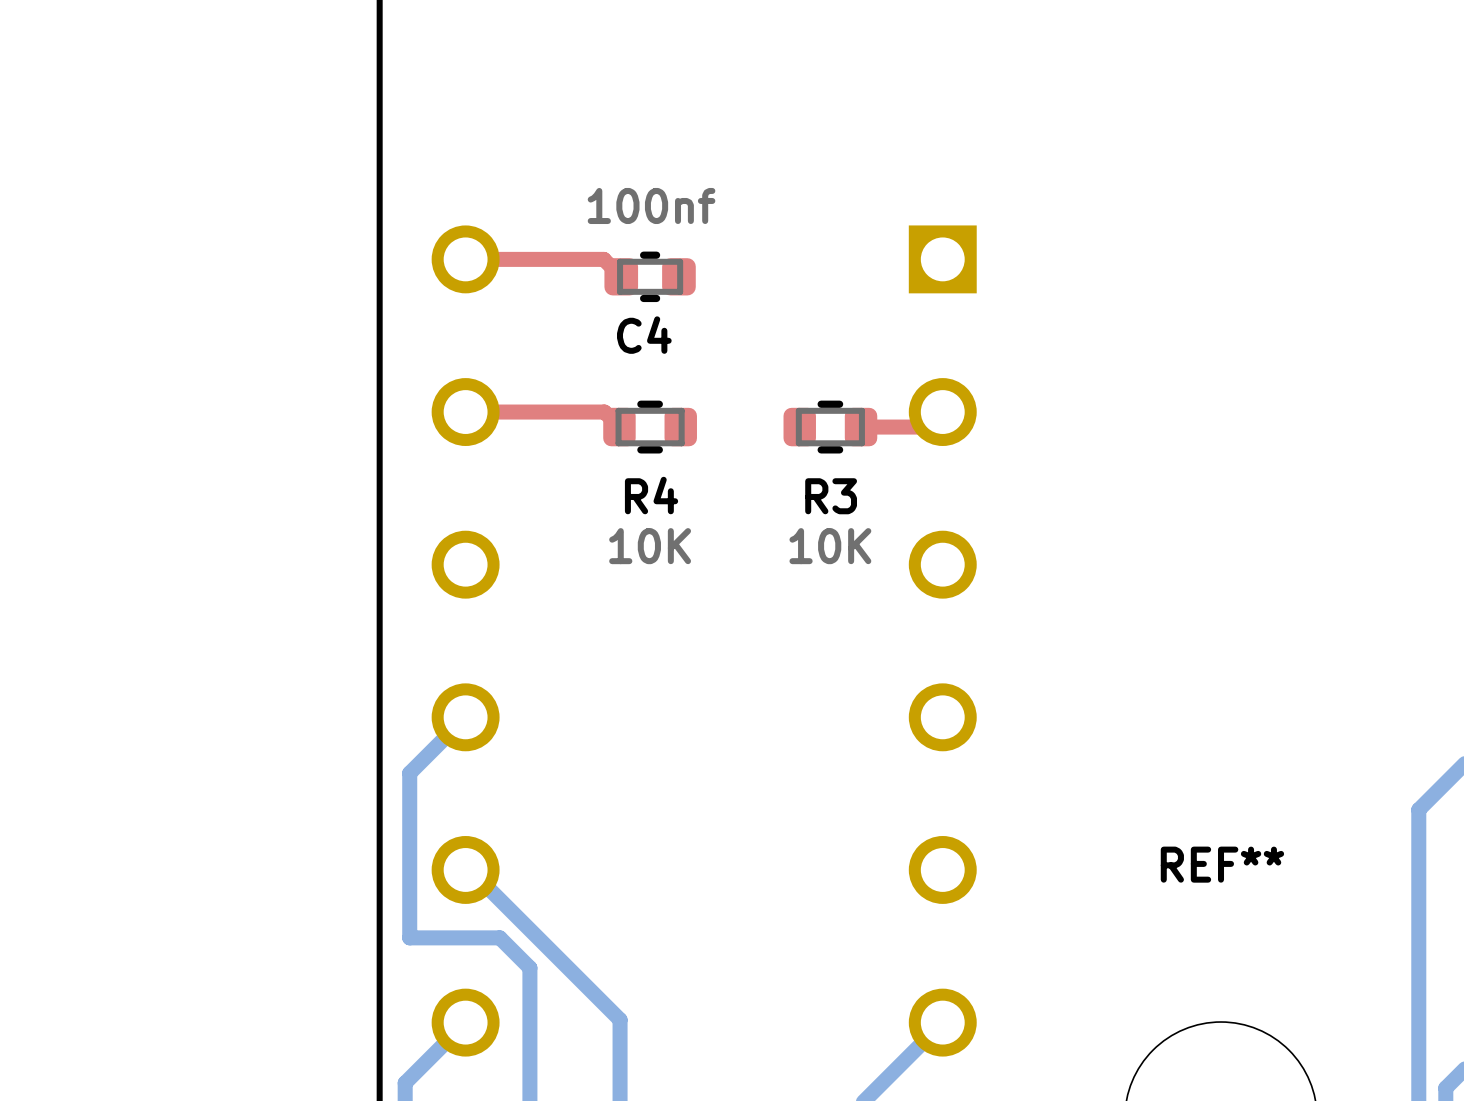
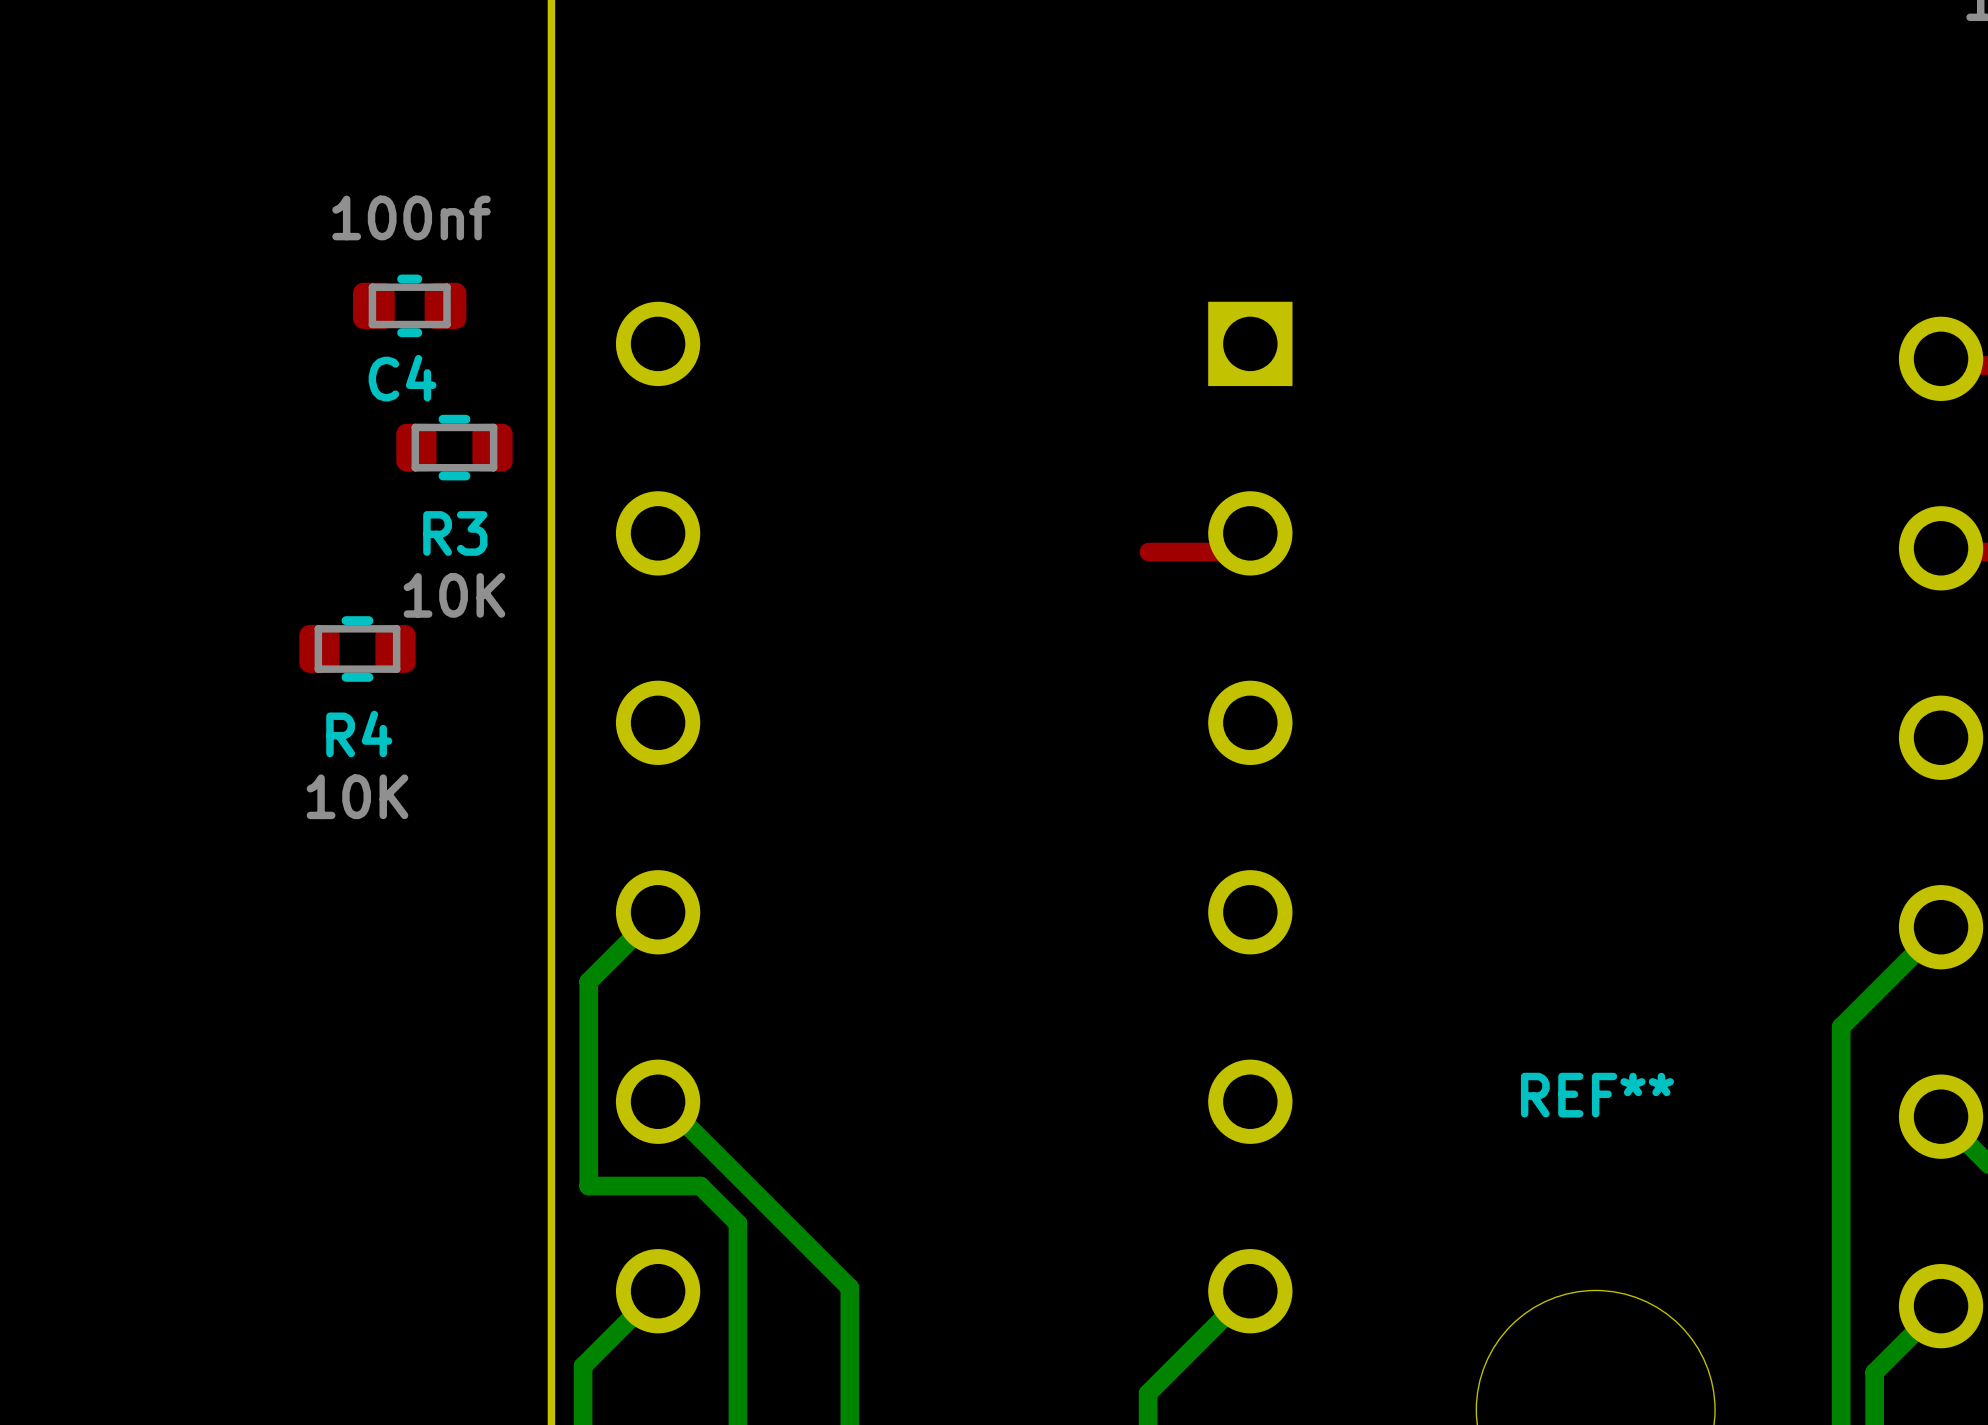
top track: (465, 259) (603, 259) (621, 276) -> none
C4 position: (650, 276) -> (409, 305)
top track: (465, 412) (604, 412) (619, 427) -> none
R4 position: (650, 427) -> (357, 648)
R3 position: (830, 427) -> (454, 447)

